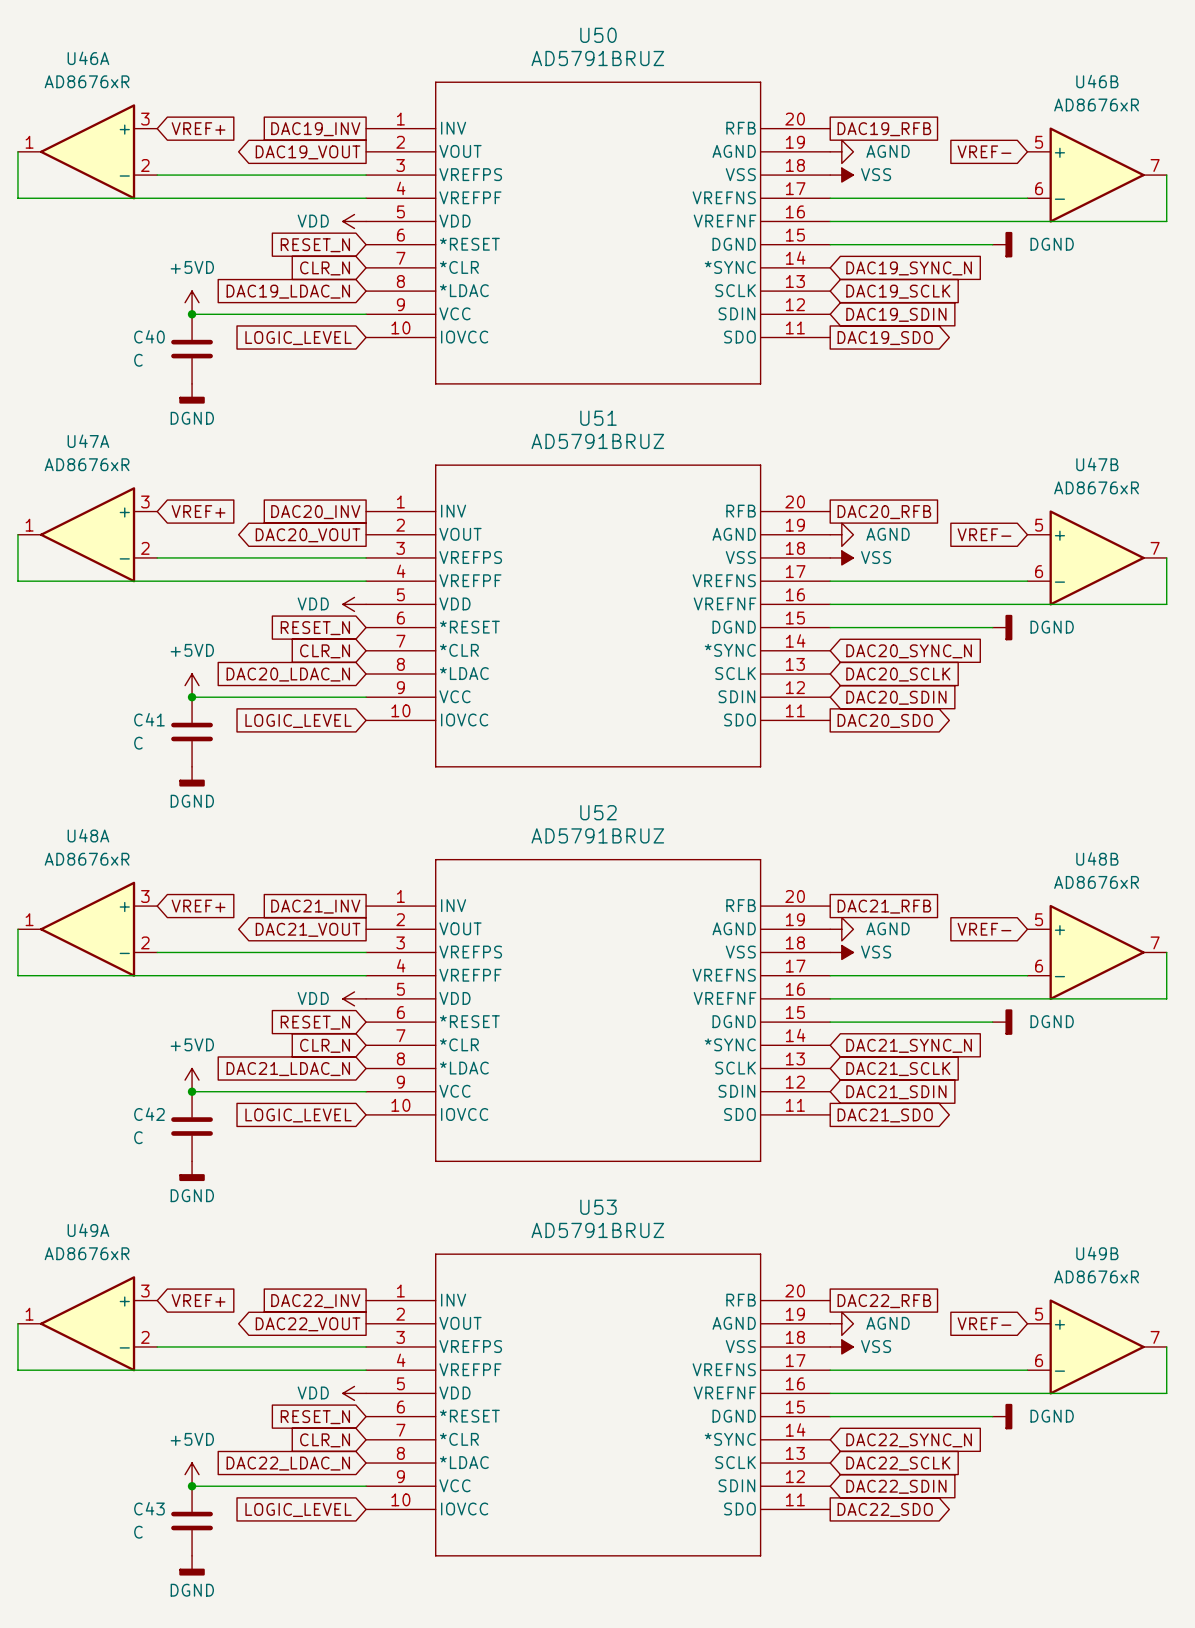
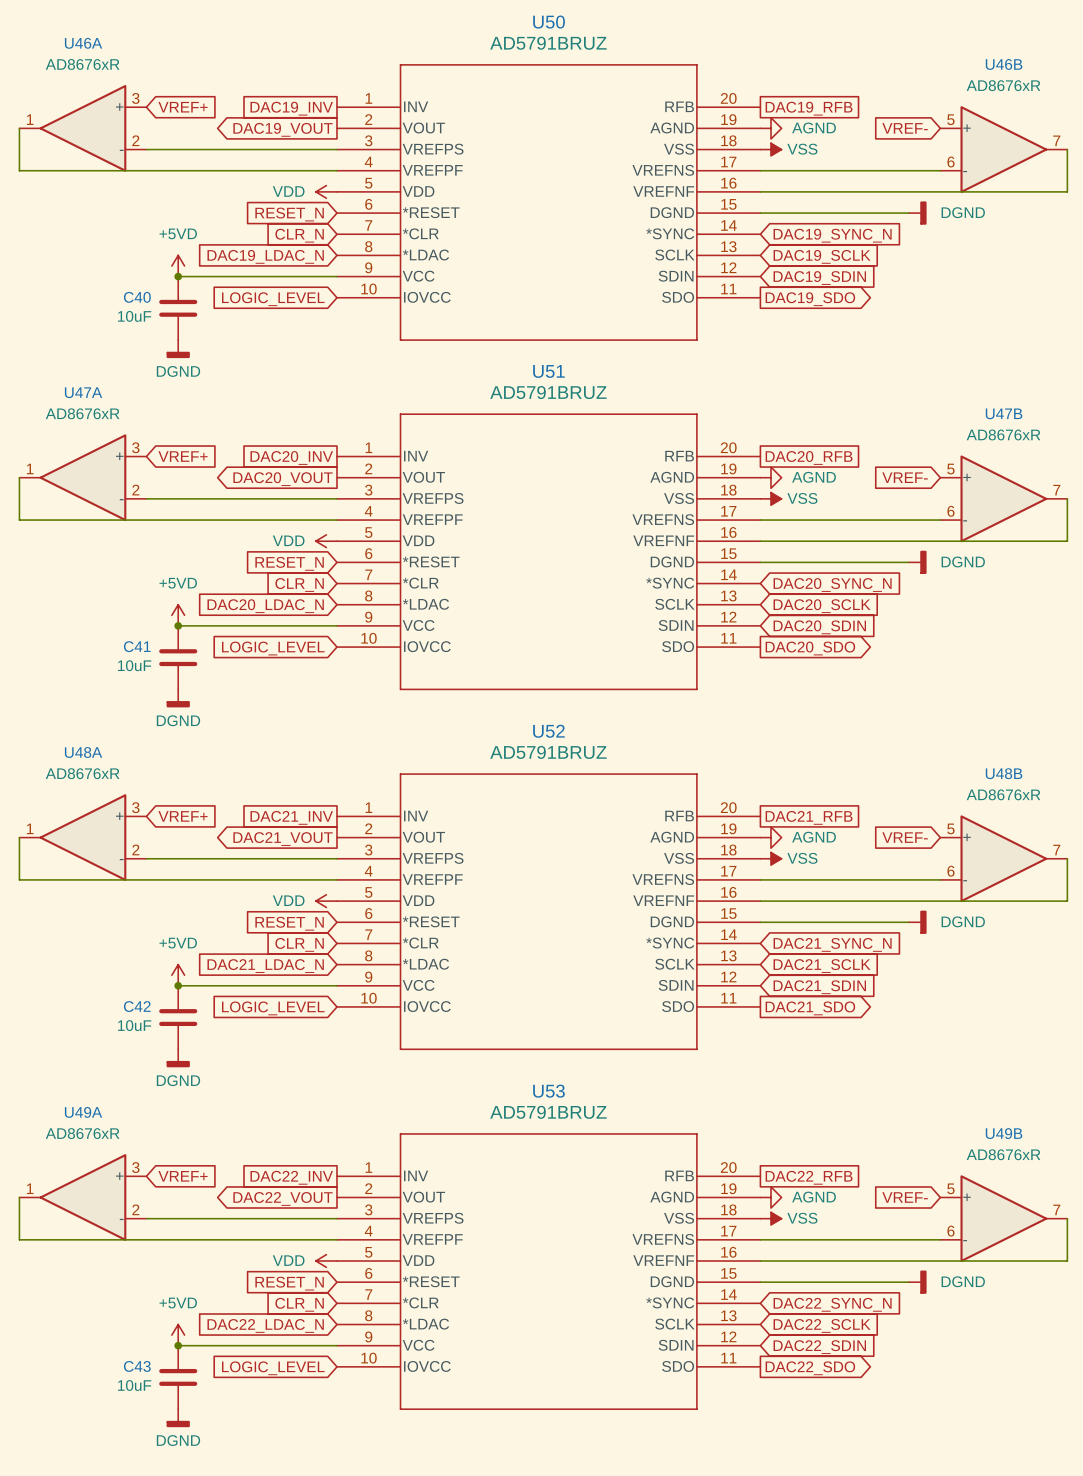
C40 value: C (138, 360) -> 10uF (134, 316)
C41 value: C (138, 743) -> 10uF (134, 665)
C42 value: C (138, 1137) -> 10uF (134, 1025)
C43 value: C (138, 1532) -> 10uF (134, 1385)

